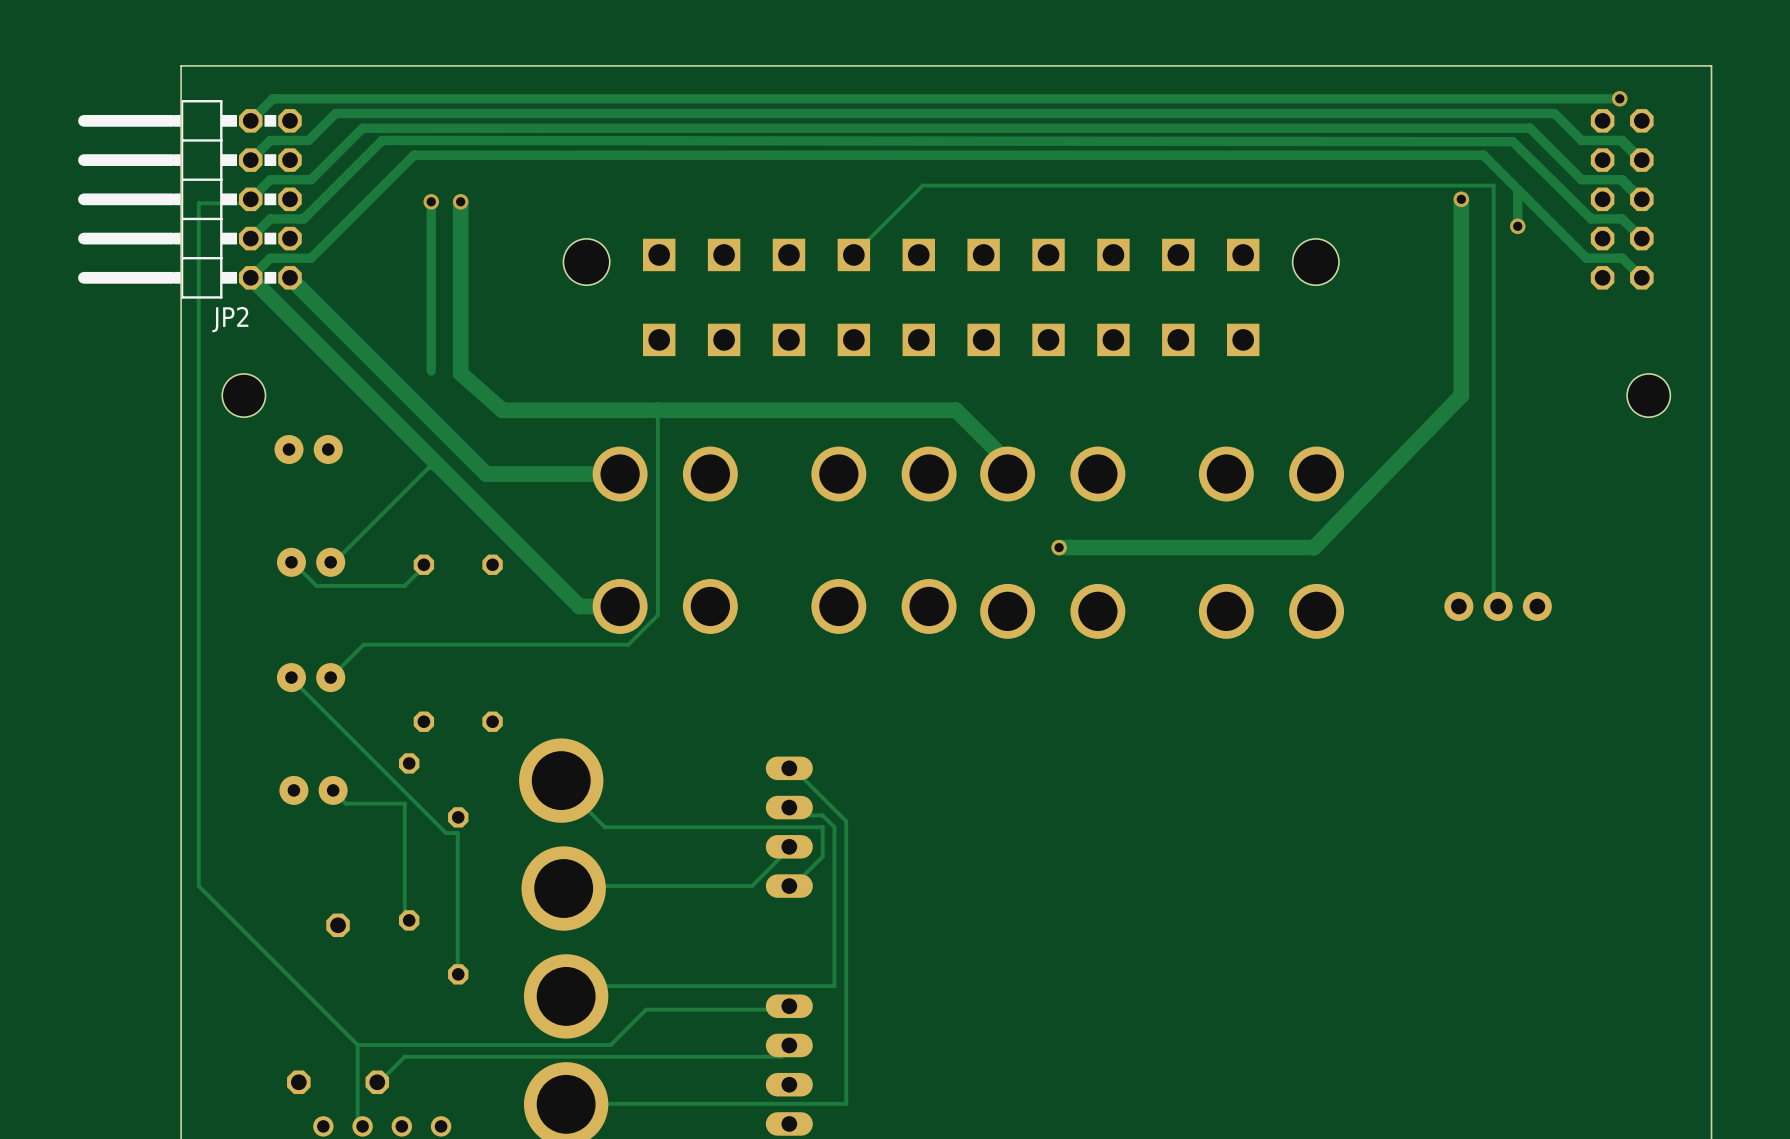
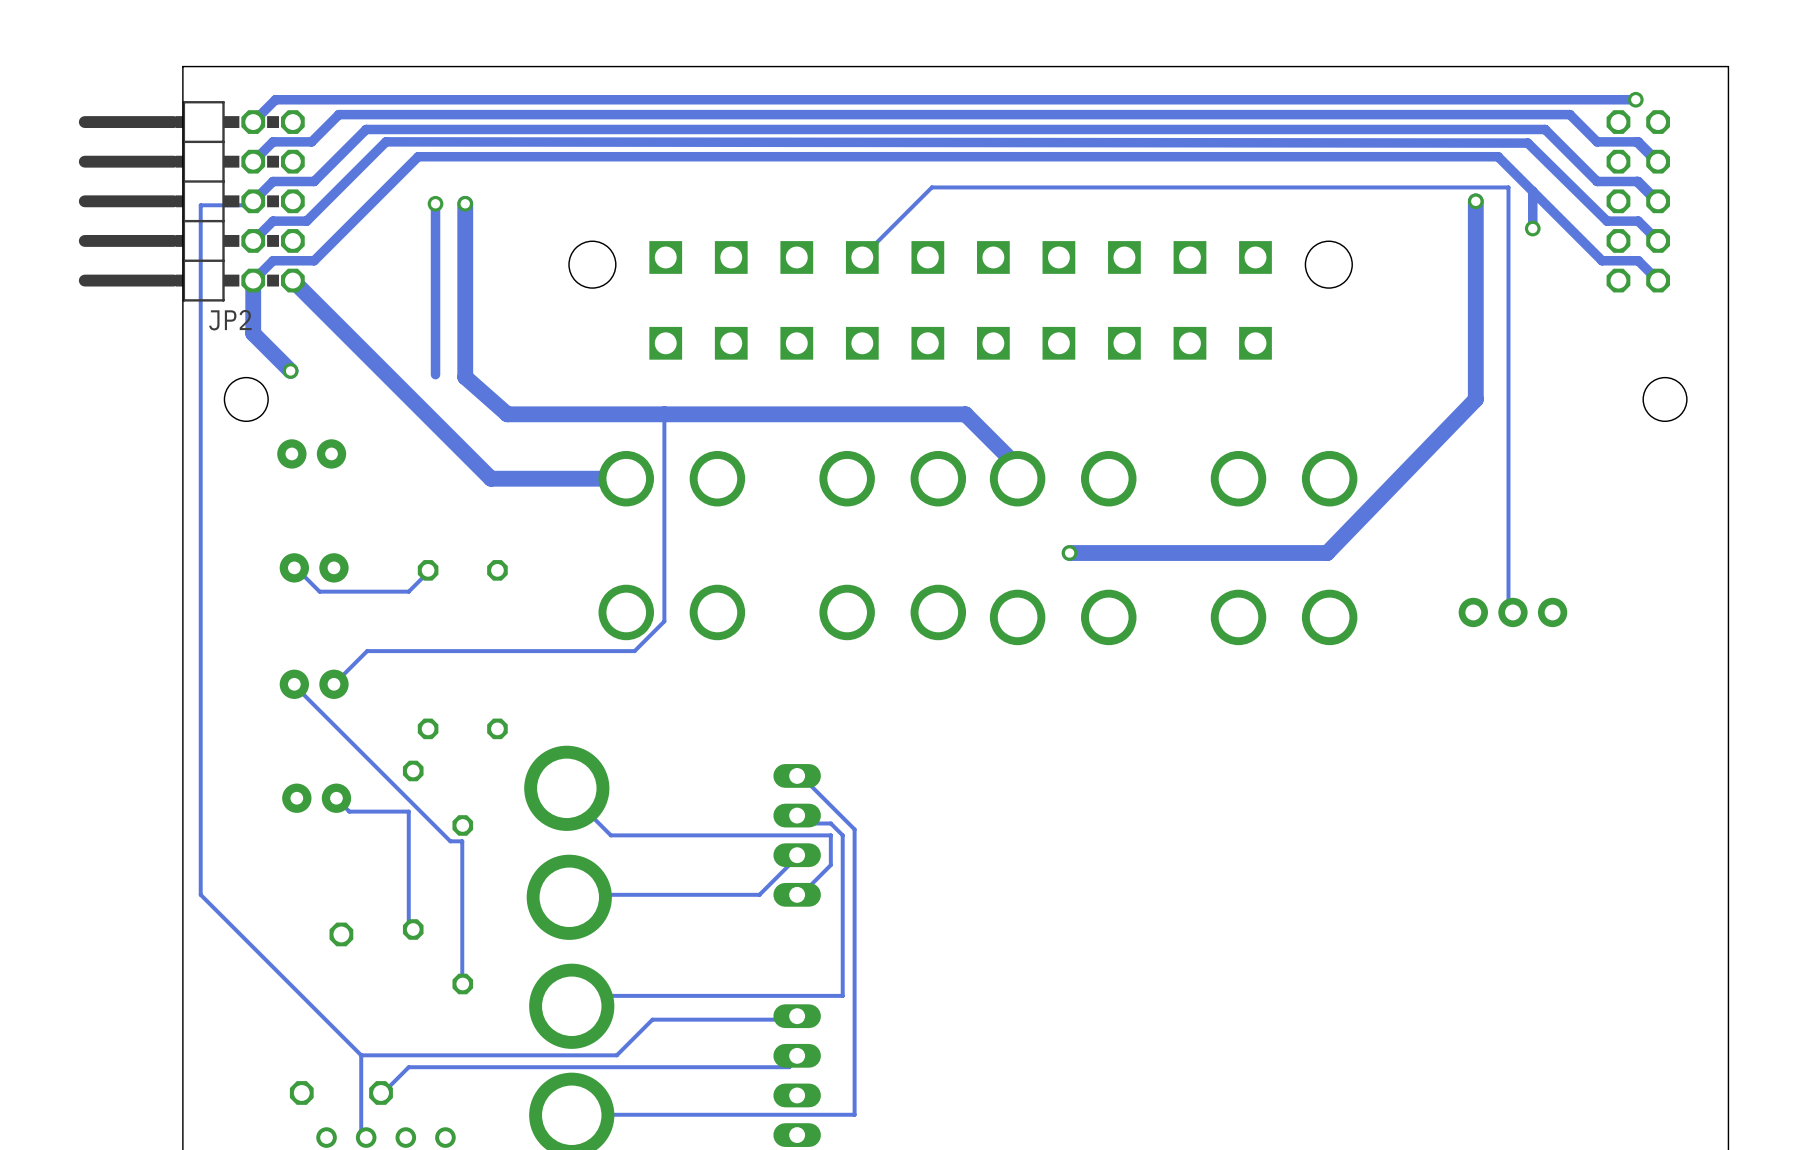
track: (250, 277) (579, 606) (620, 606) -> (253, 280) (253, 333) (290, 370)
via: none -> (290, 370)
track: (437, 464) (434, 468) (428, 468) (334, 562) (330, 562) -> none

